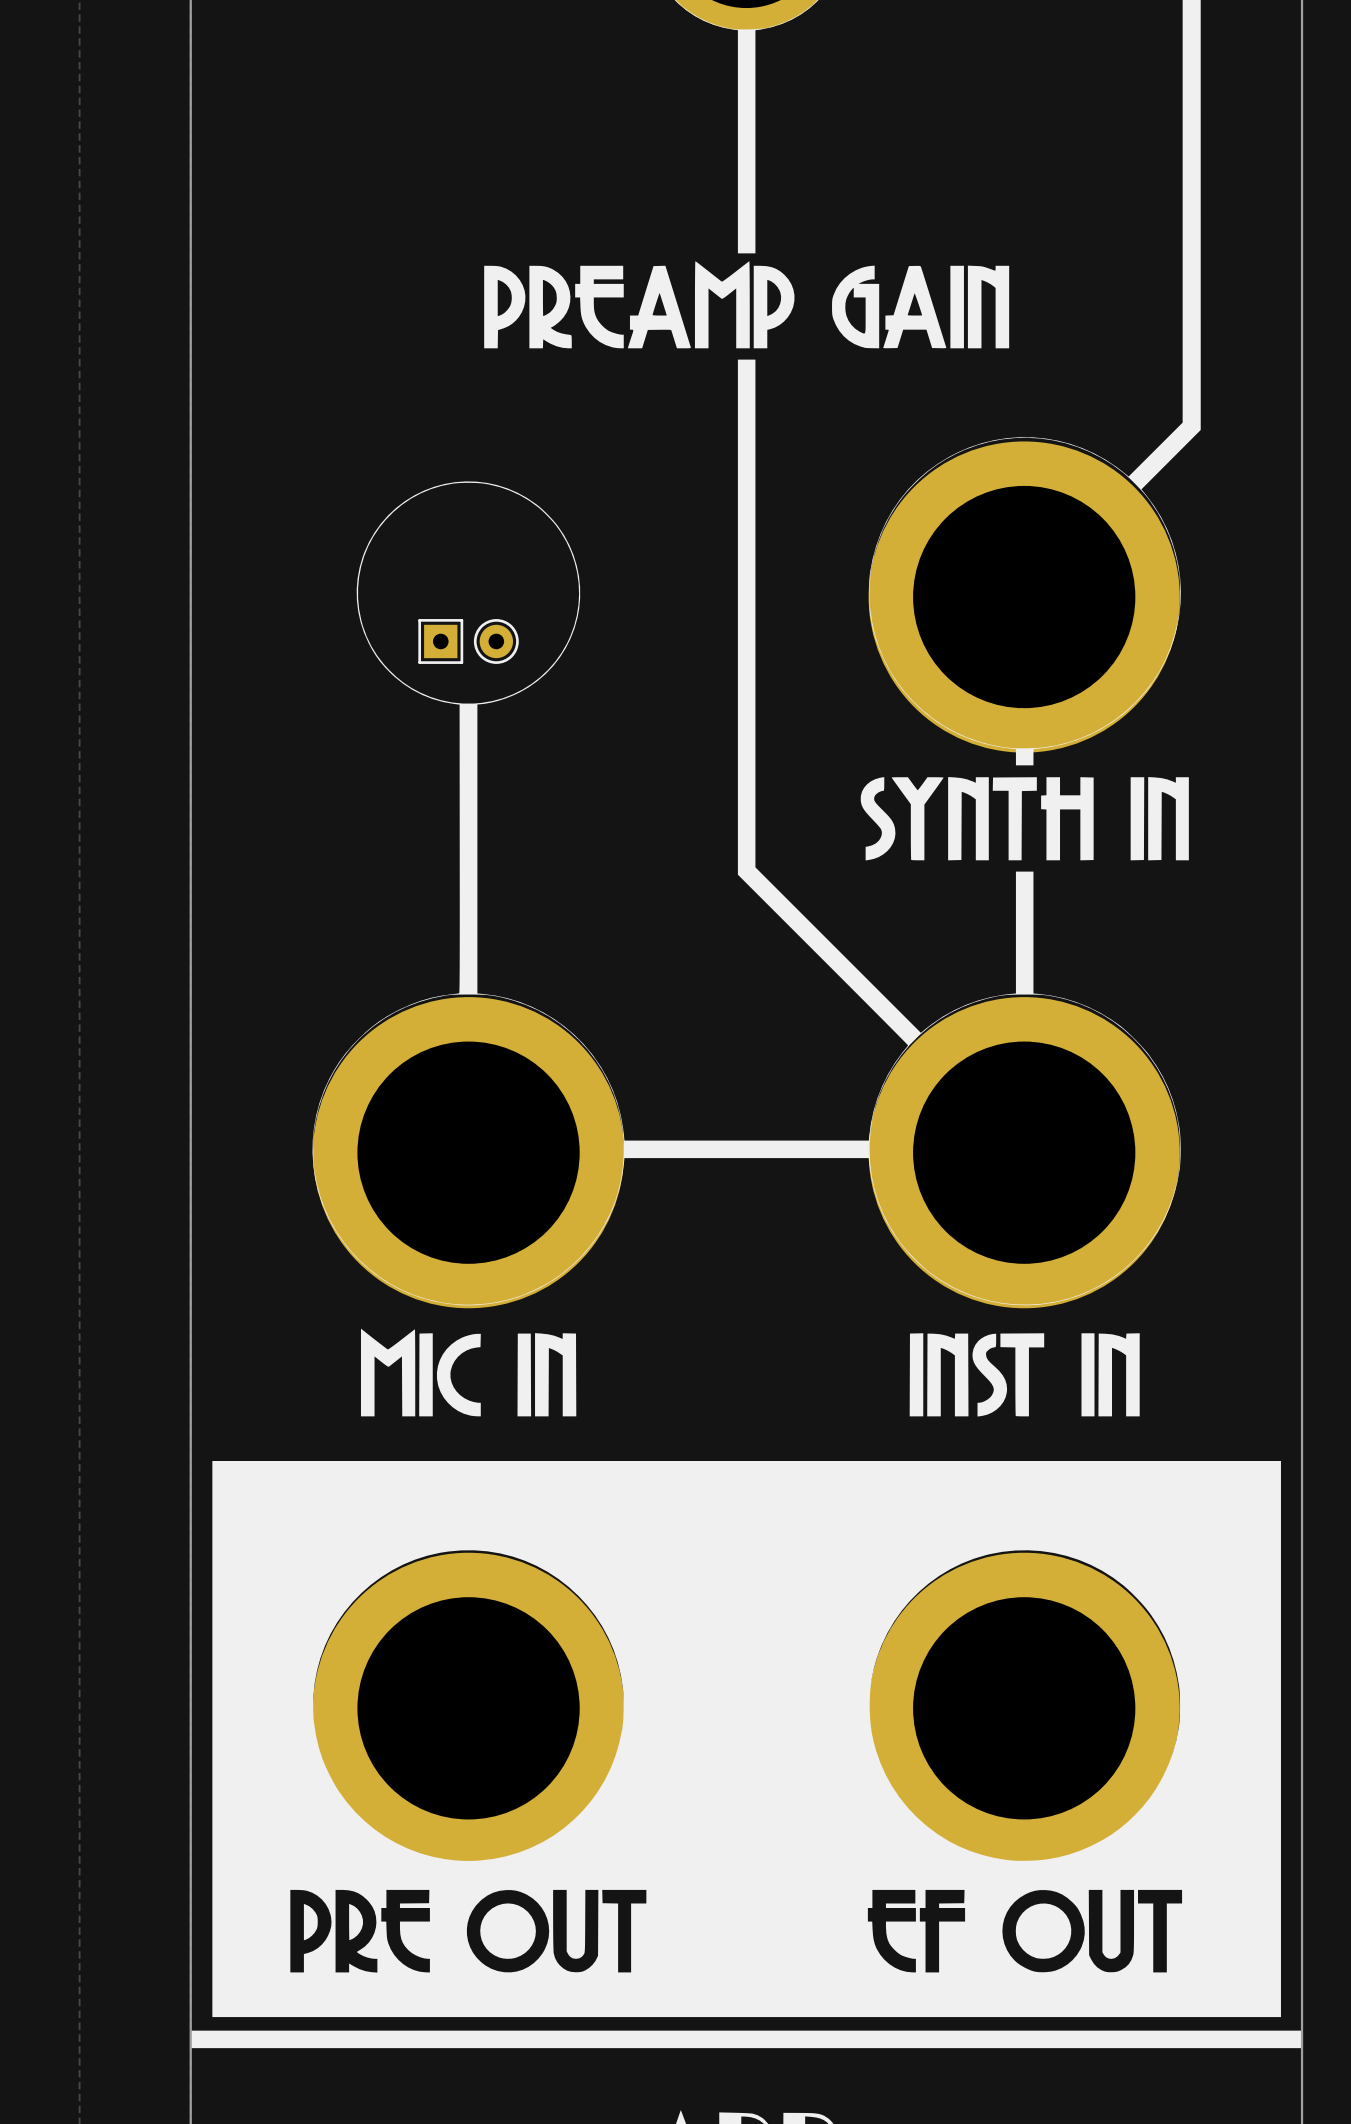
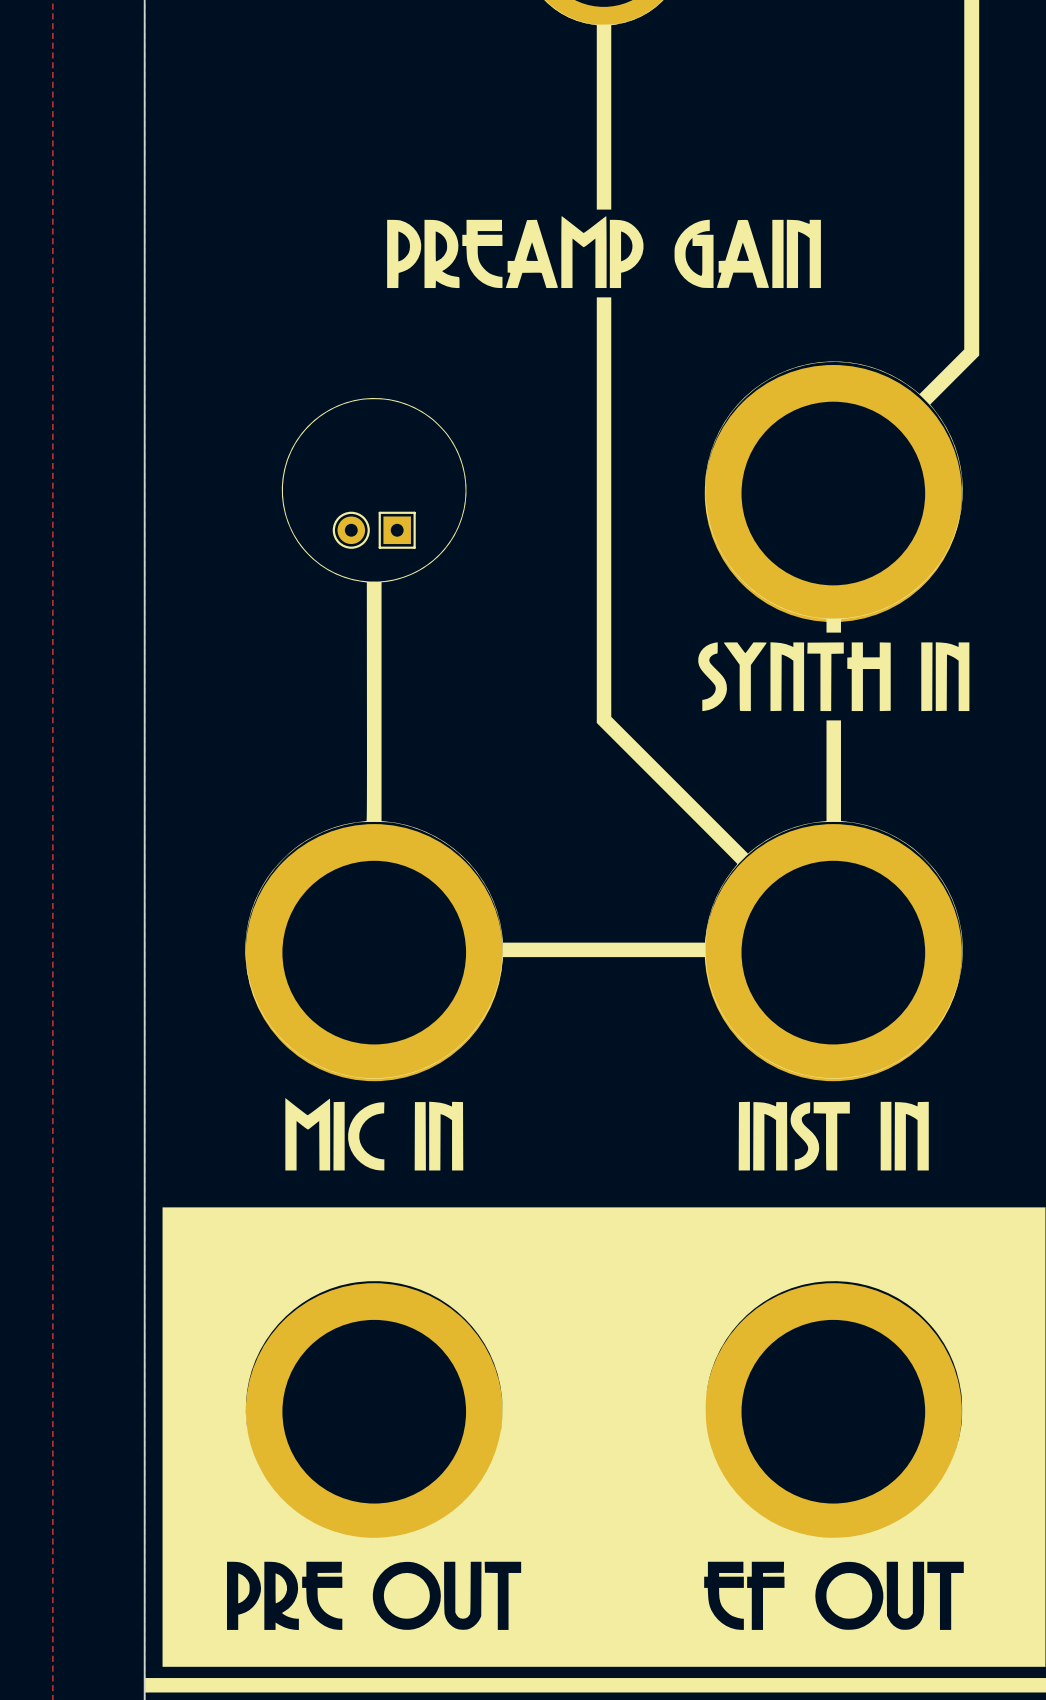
part footprint: [418, 619, 464, 664] -> [332, 511, 370, 549]
part footprint: [473, 619, 519, 664] -> [378, 511, 416, 549]

